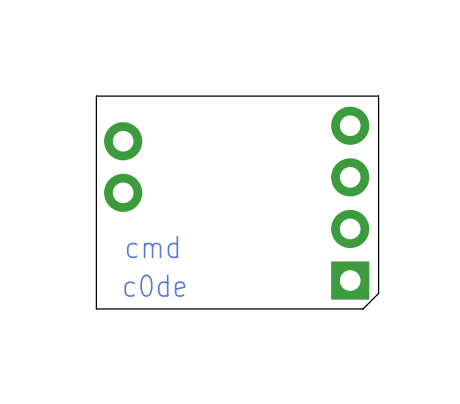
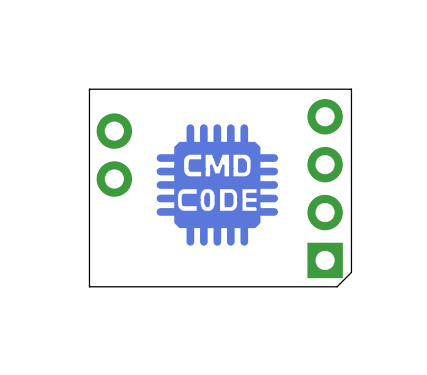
drawing: none -> [156, 124, 279, 246]
text: cmd (152, 247) -> none
text: c0de (154, 285) -> none

